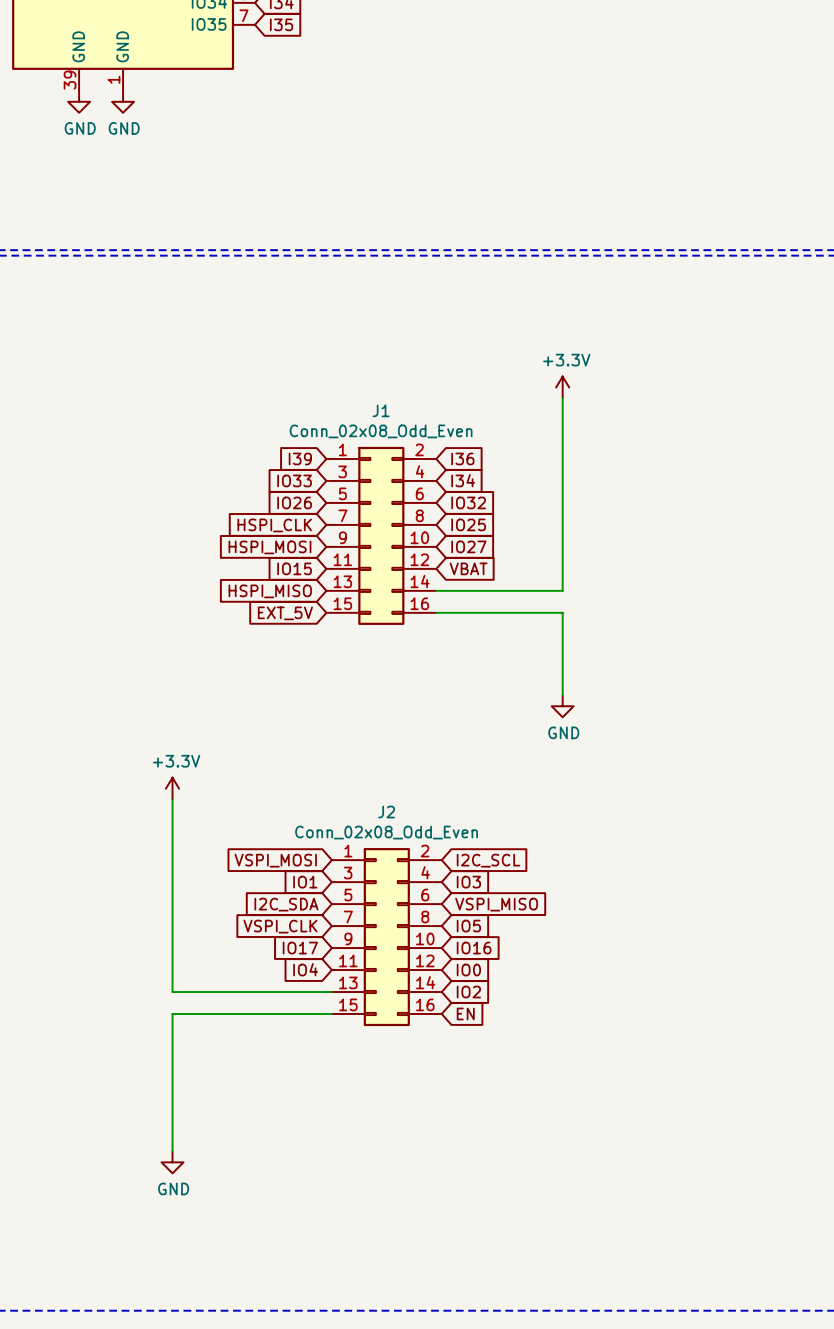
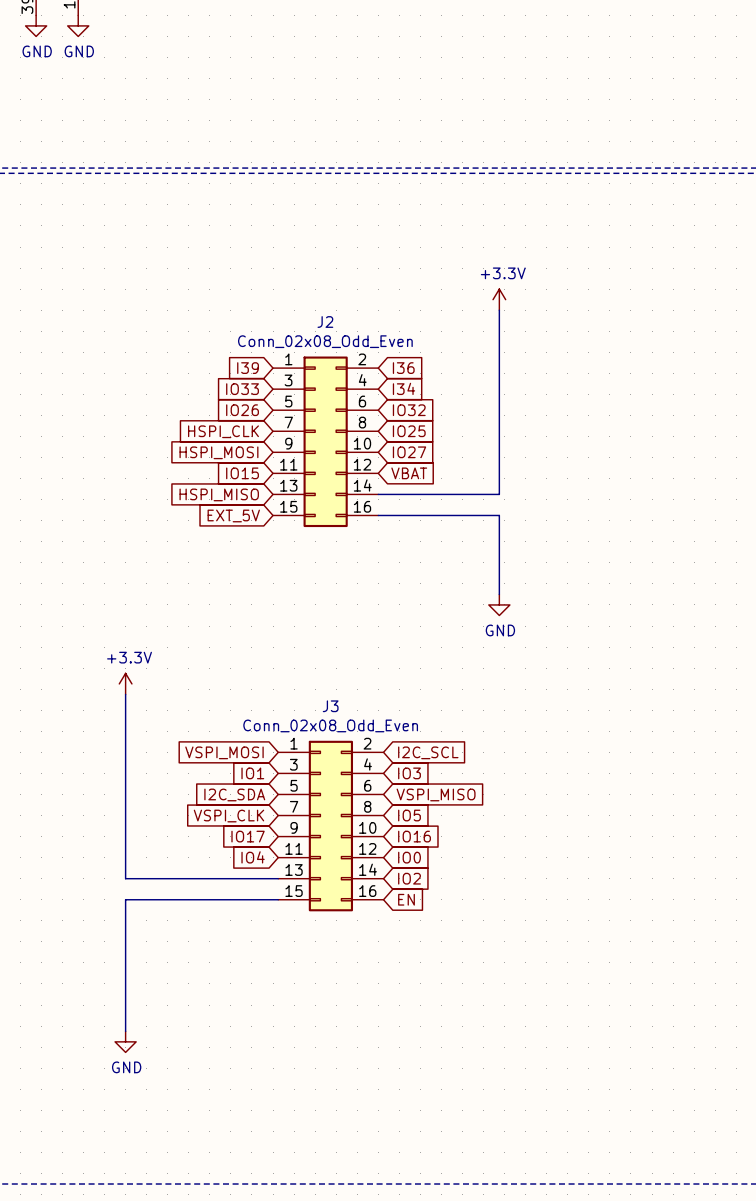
J1 name: J1 (381, 410) -> J2 (325, 322)
J2 name: J2 (386, 812) -> J3 (330, 706)

